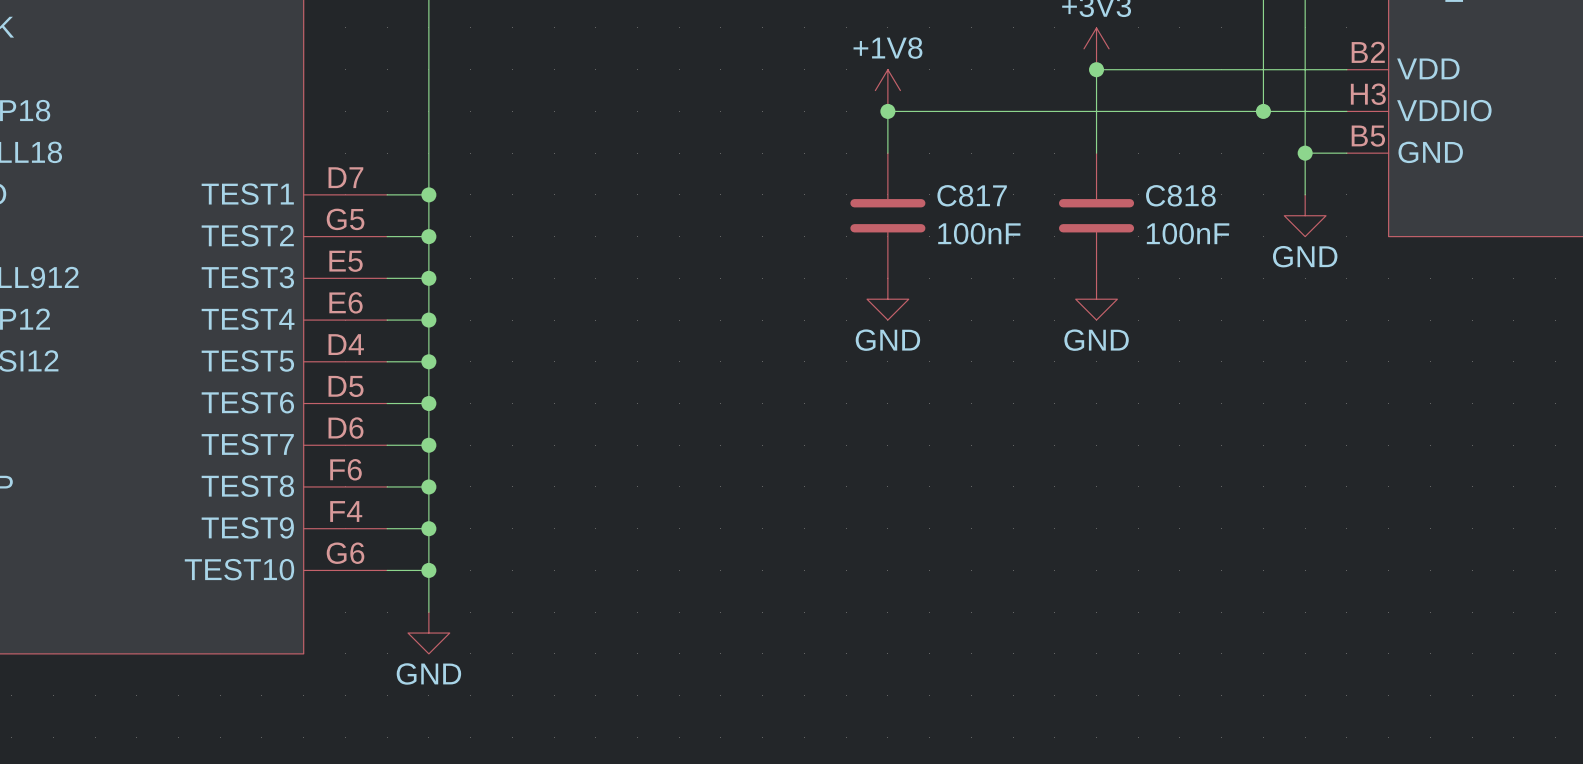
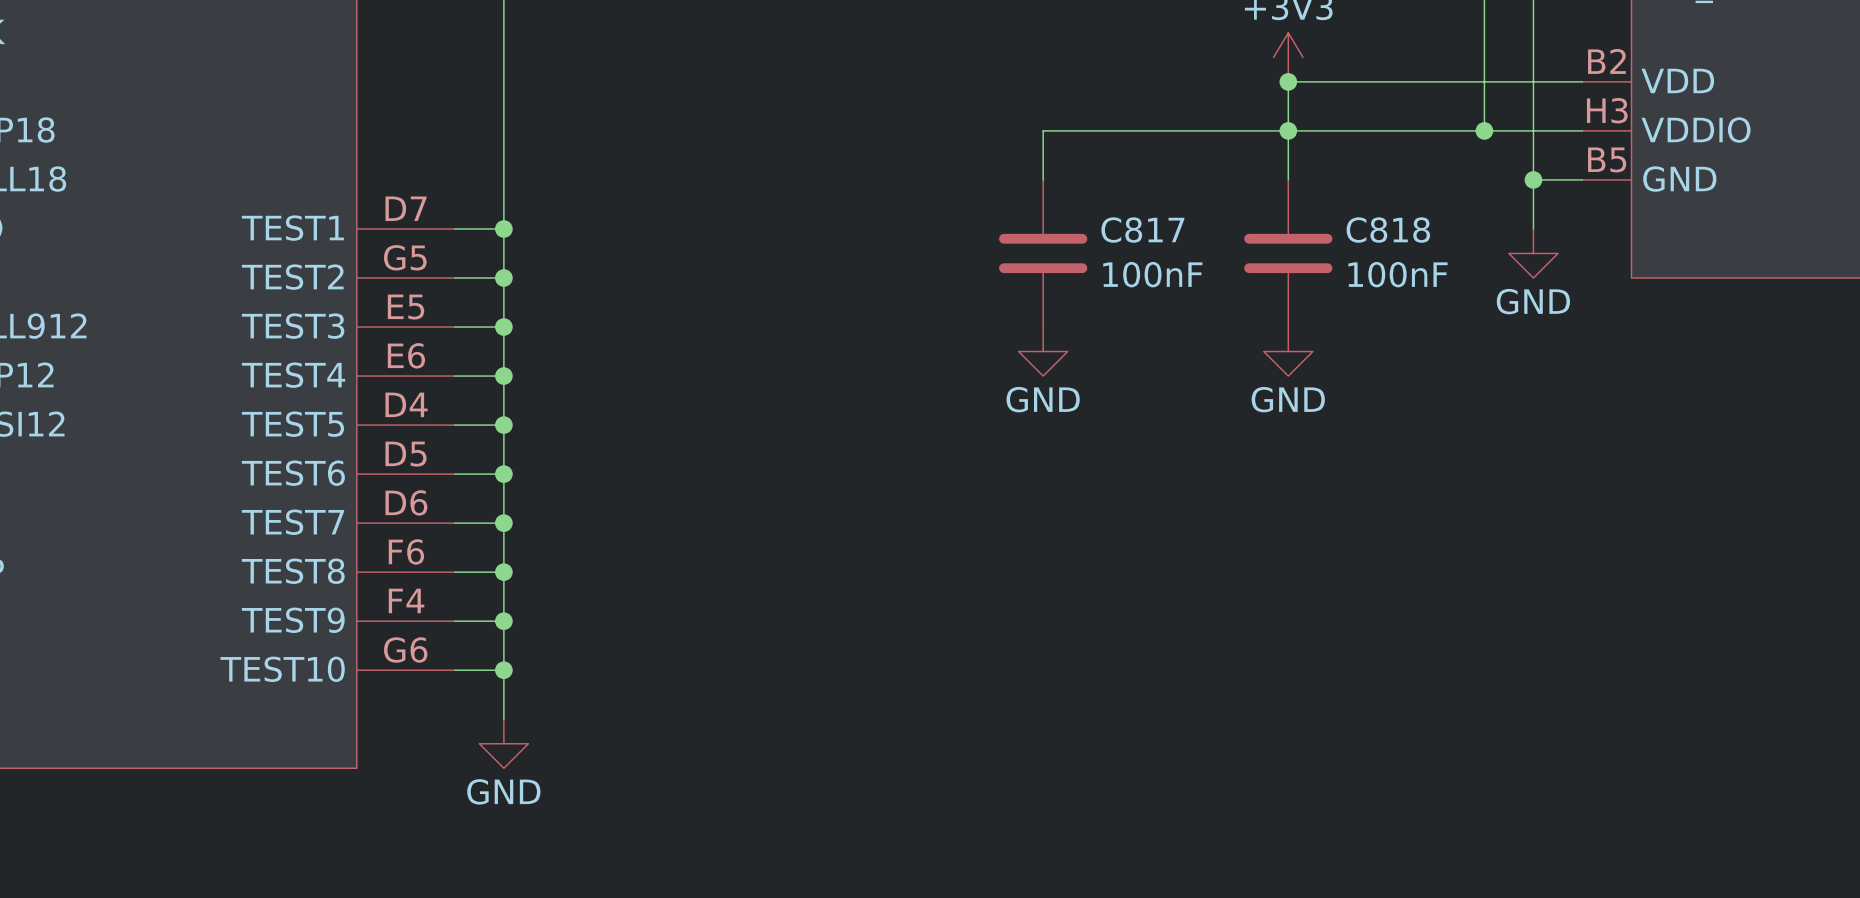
power symbol: +1V8 (887, 90) -> none
junction: (887, 111) -> none
junction: none -> (1288, 130)

